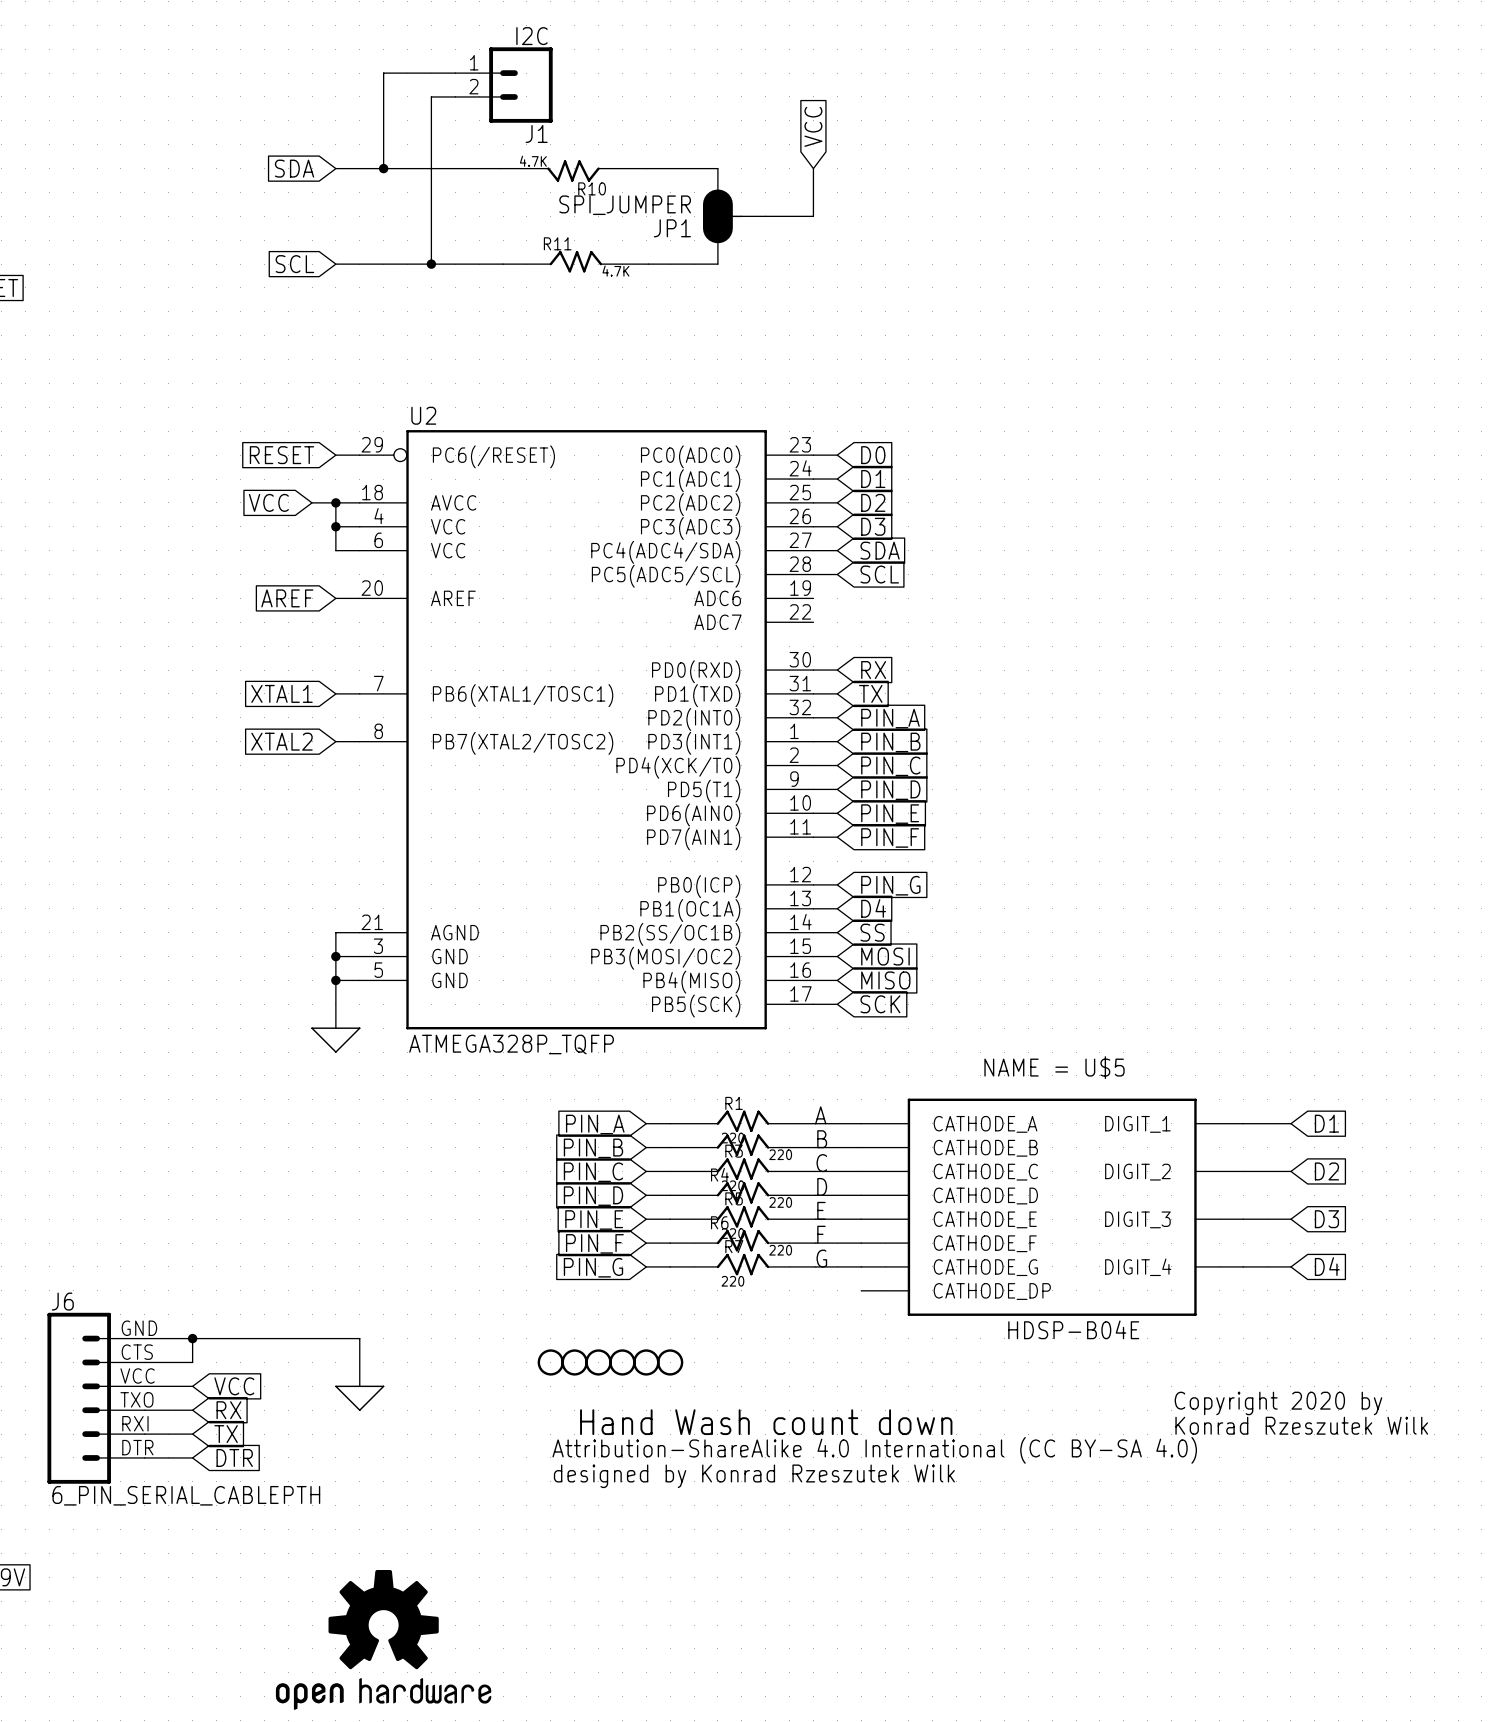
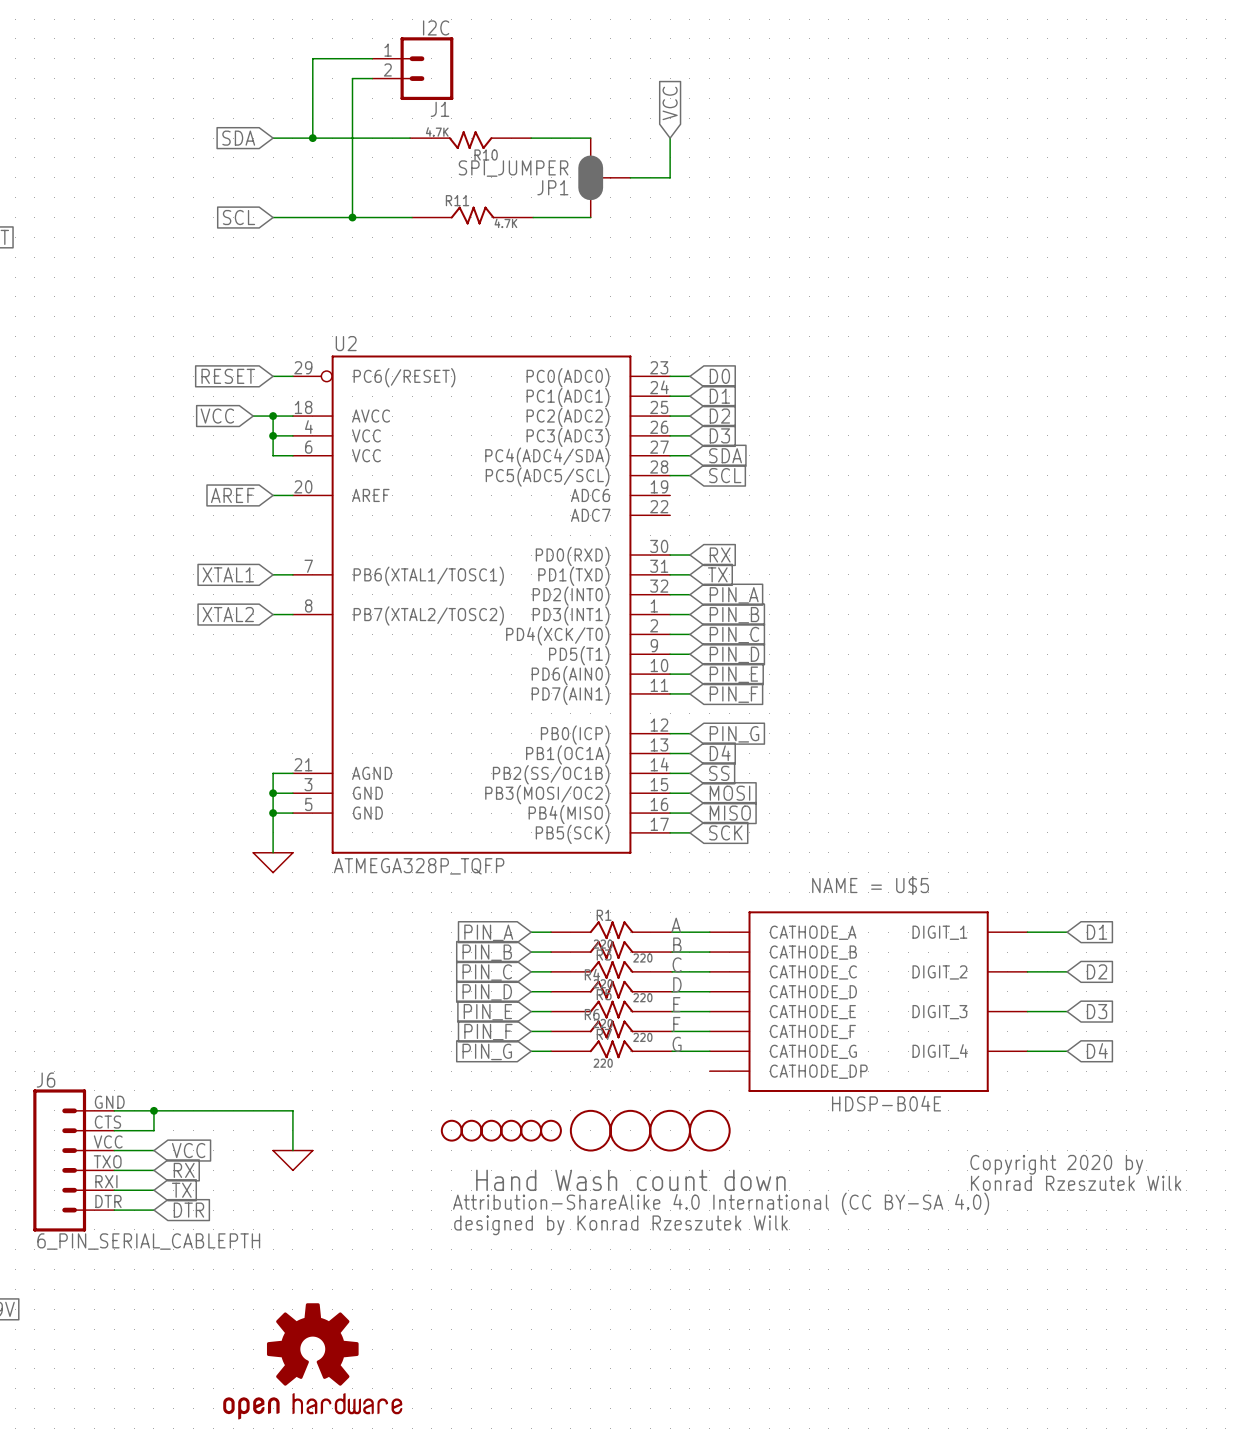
part: none -> (590, 1130)
part: none -> (630, 1130)
part: none -> (670, 1130)
part: none -> (709, 1130)

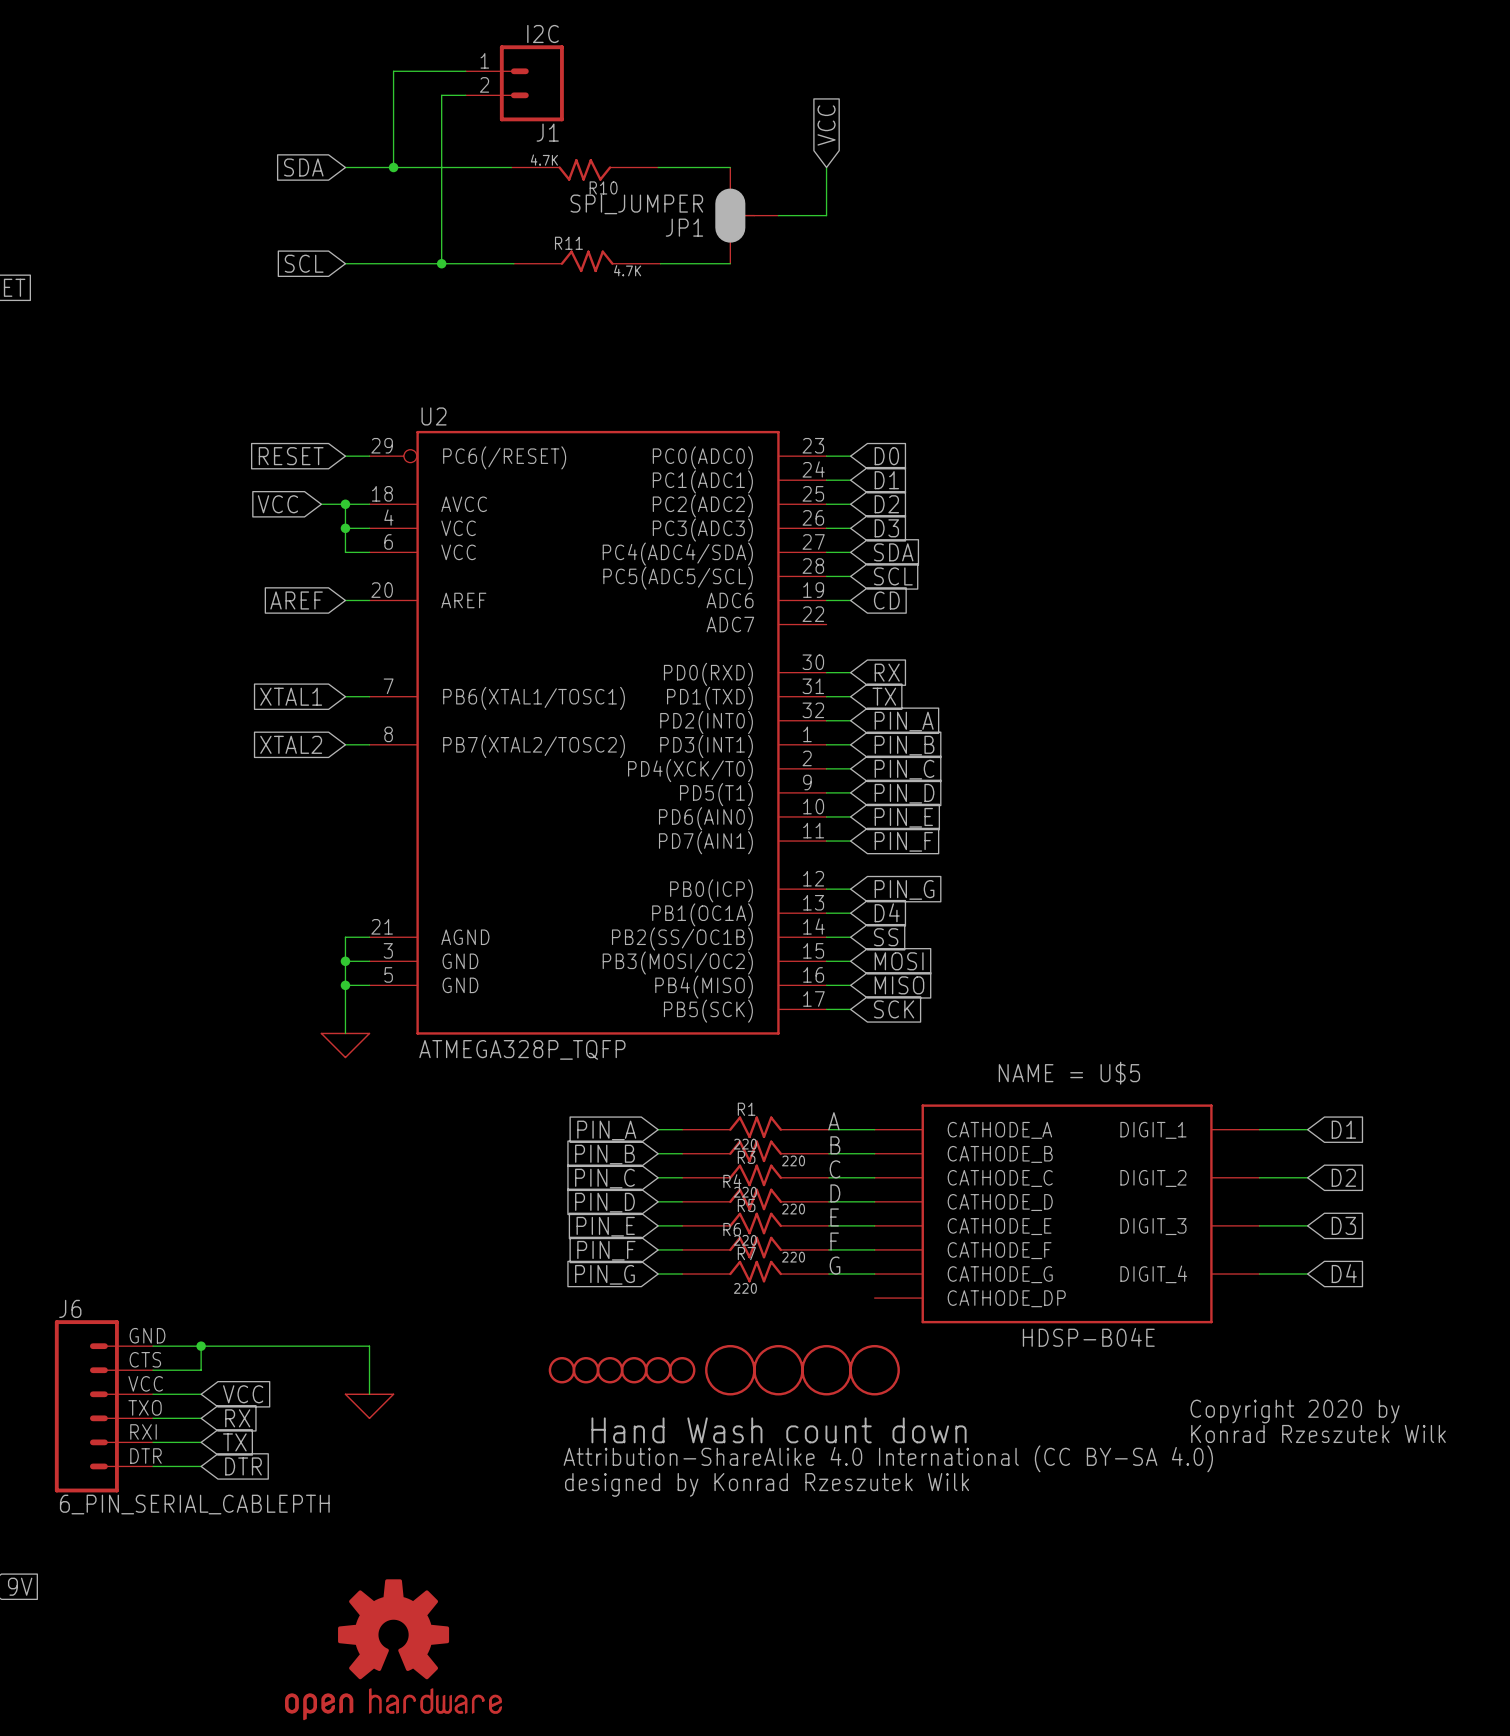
wire: none -> (826, 600) (850, 600)
global label: none -> CD (886, 600)

